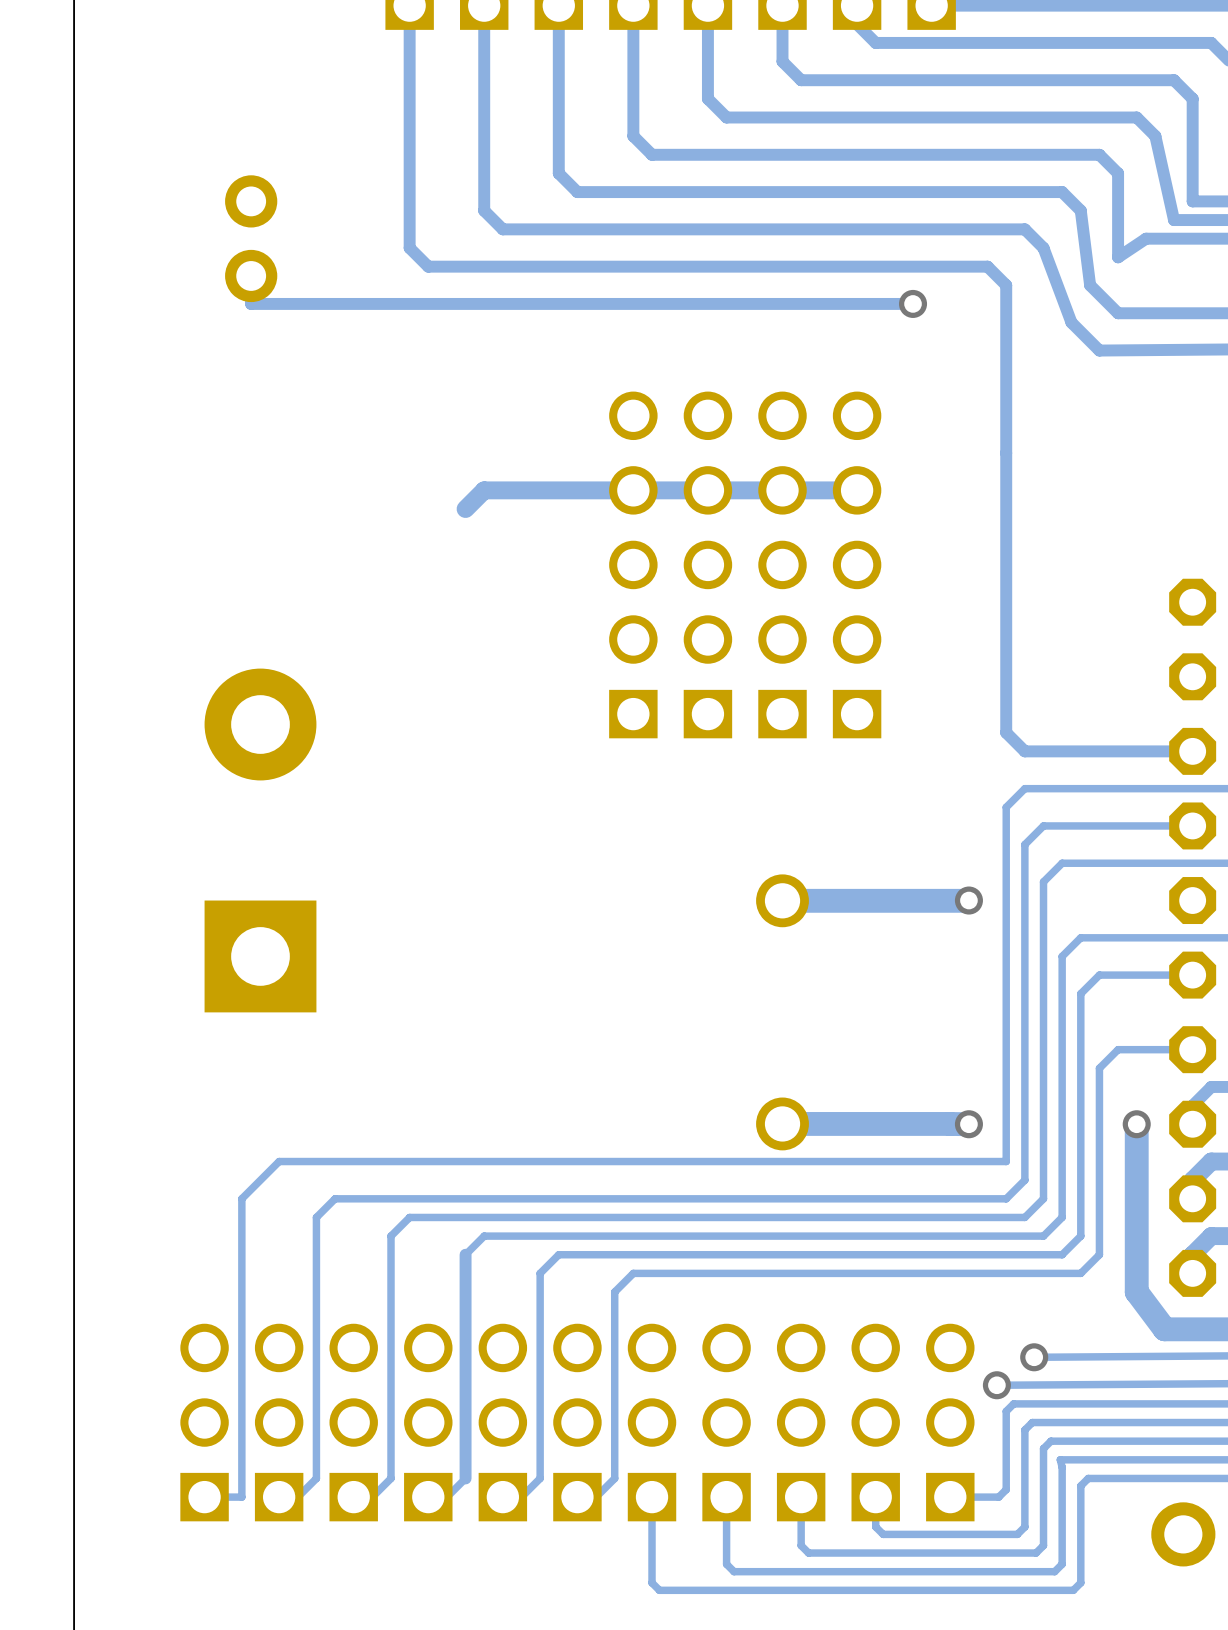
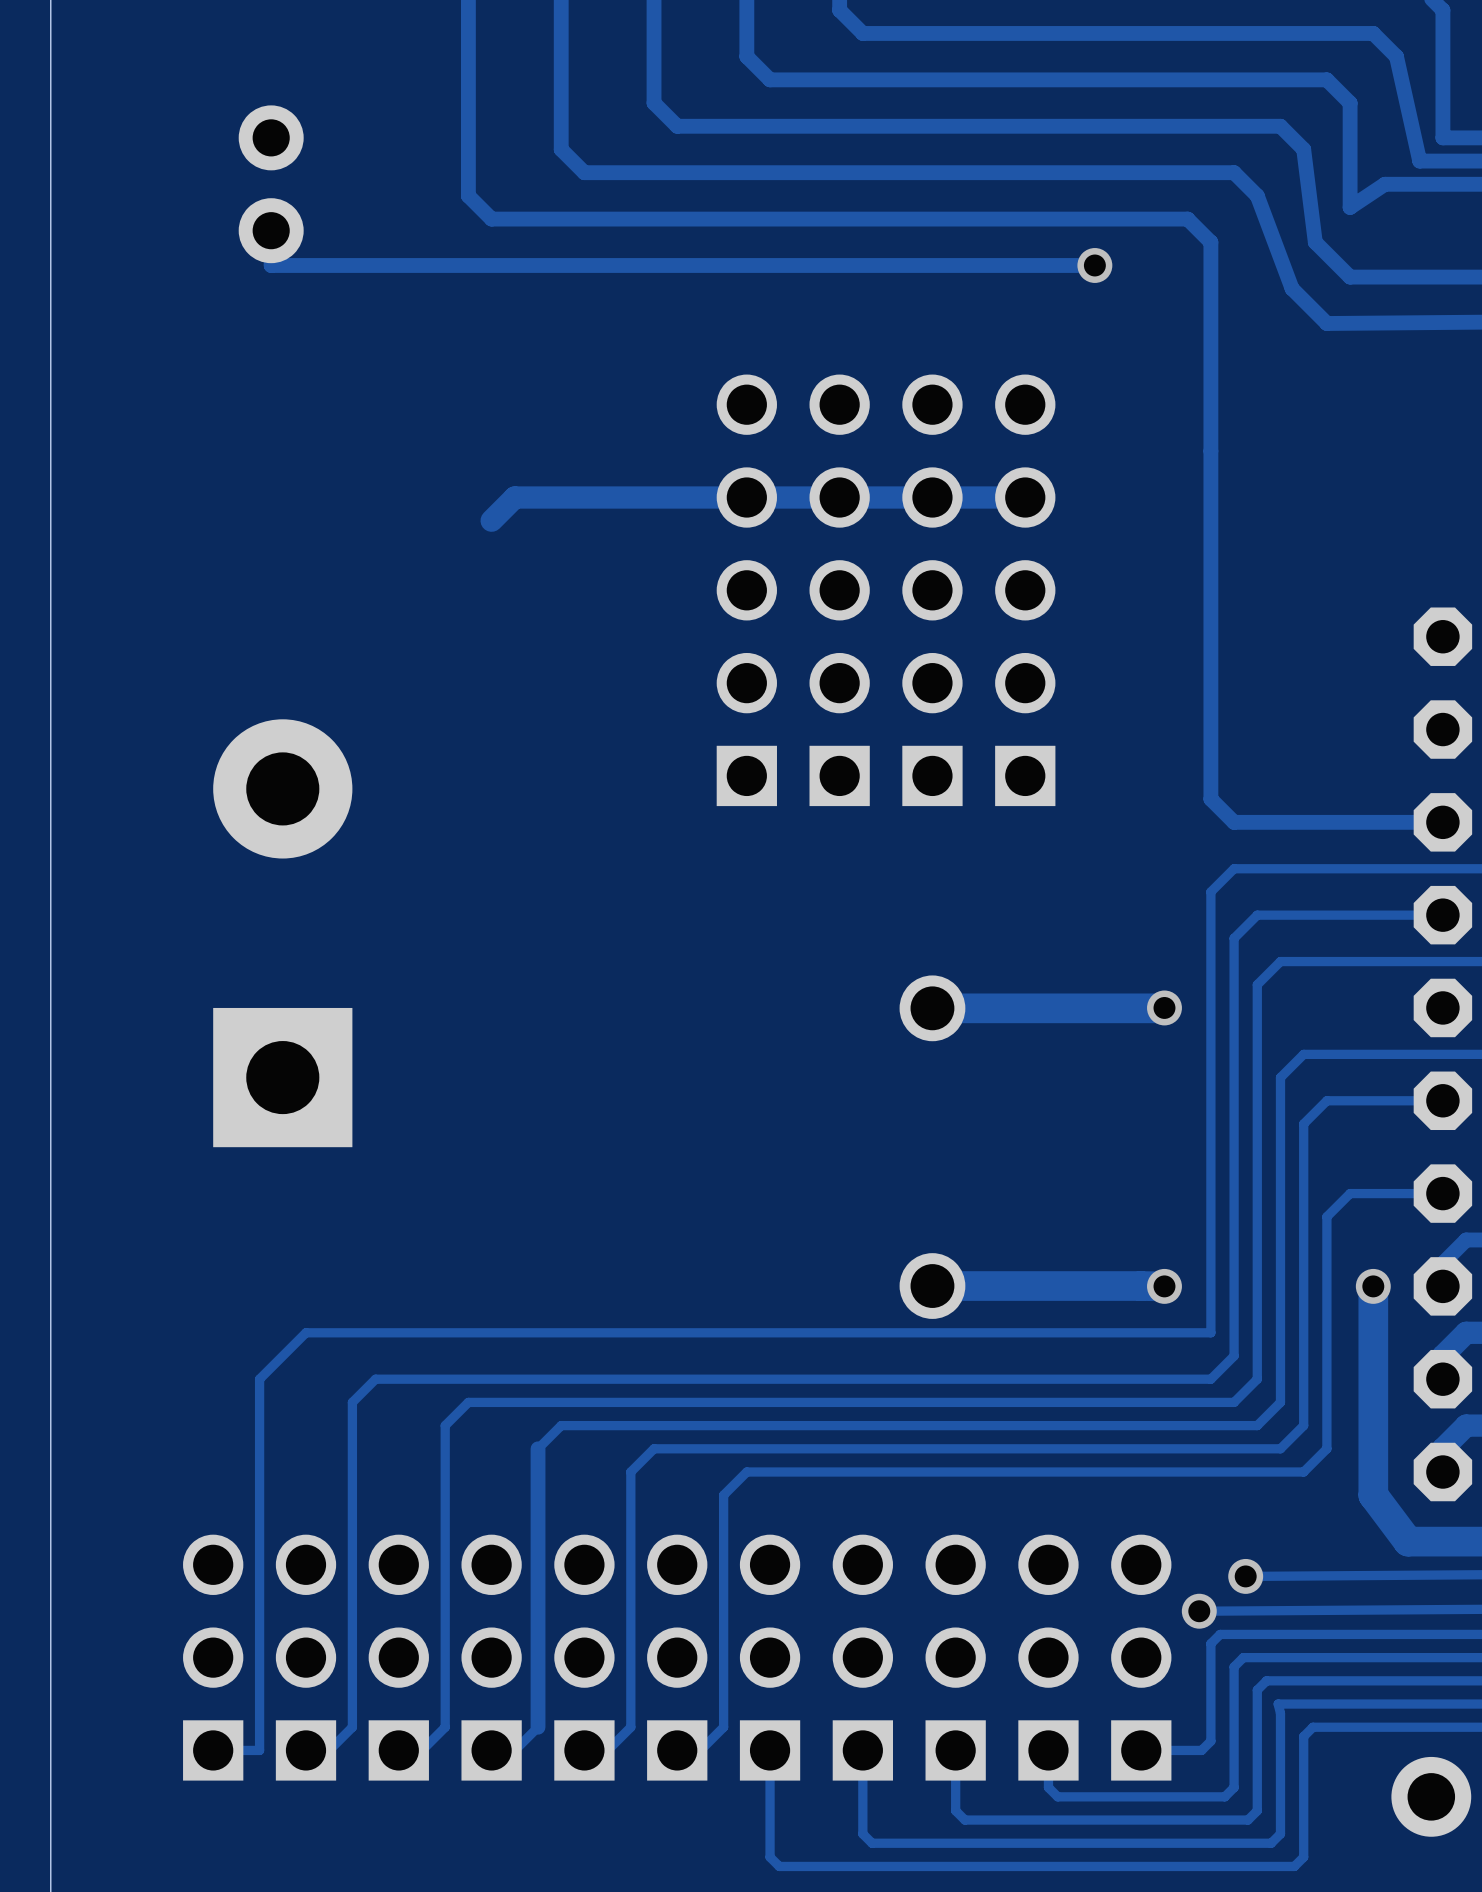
track: (484, 490) (465, 509) -> (561, 497) (514, 497) (491, 520)

